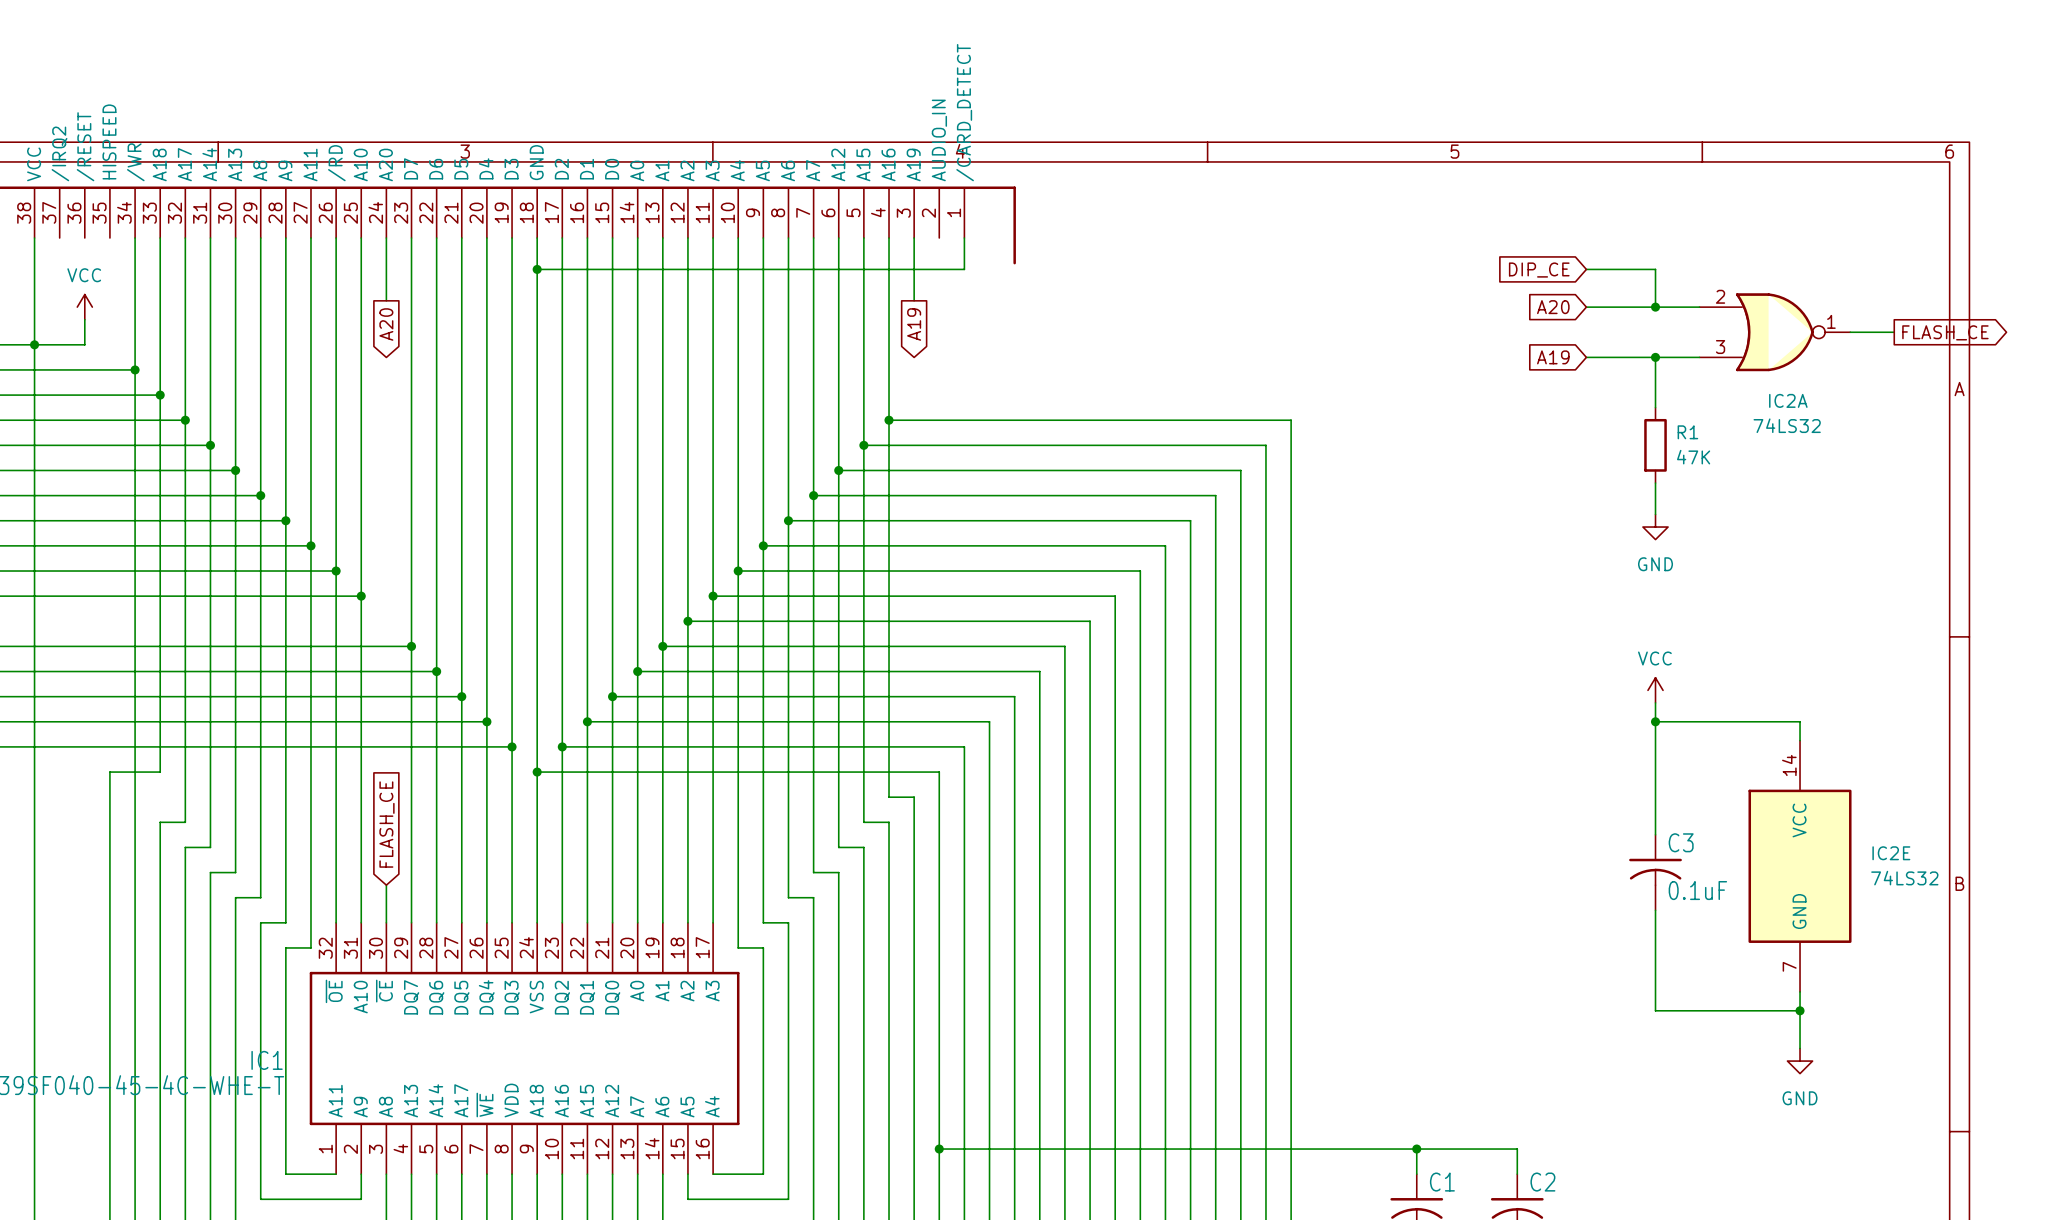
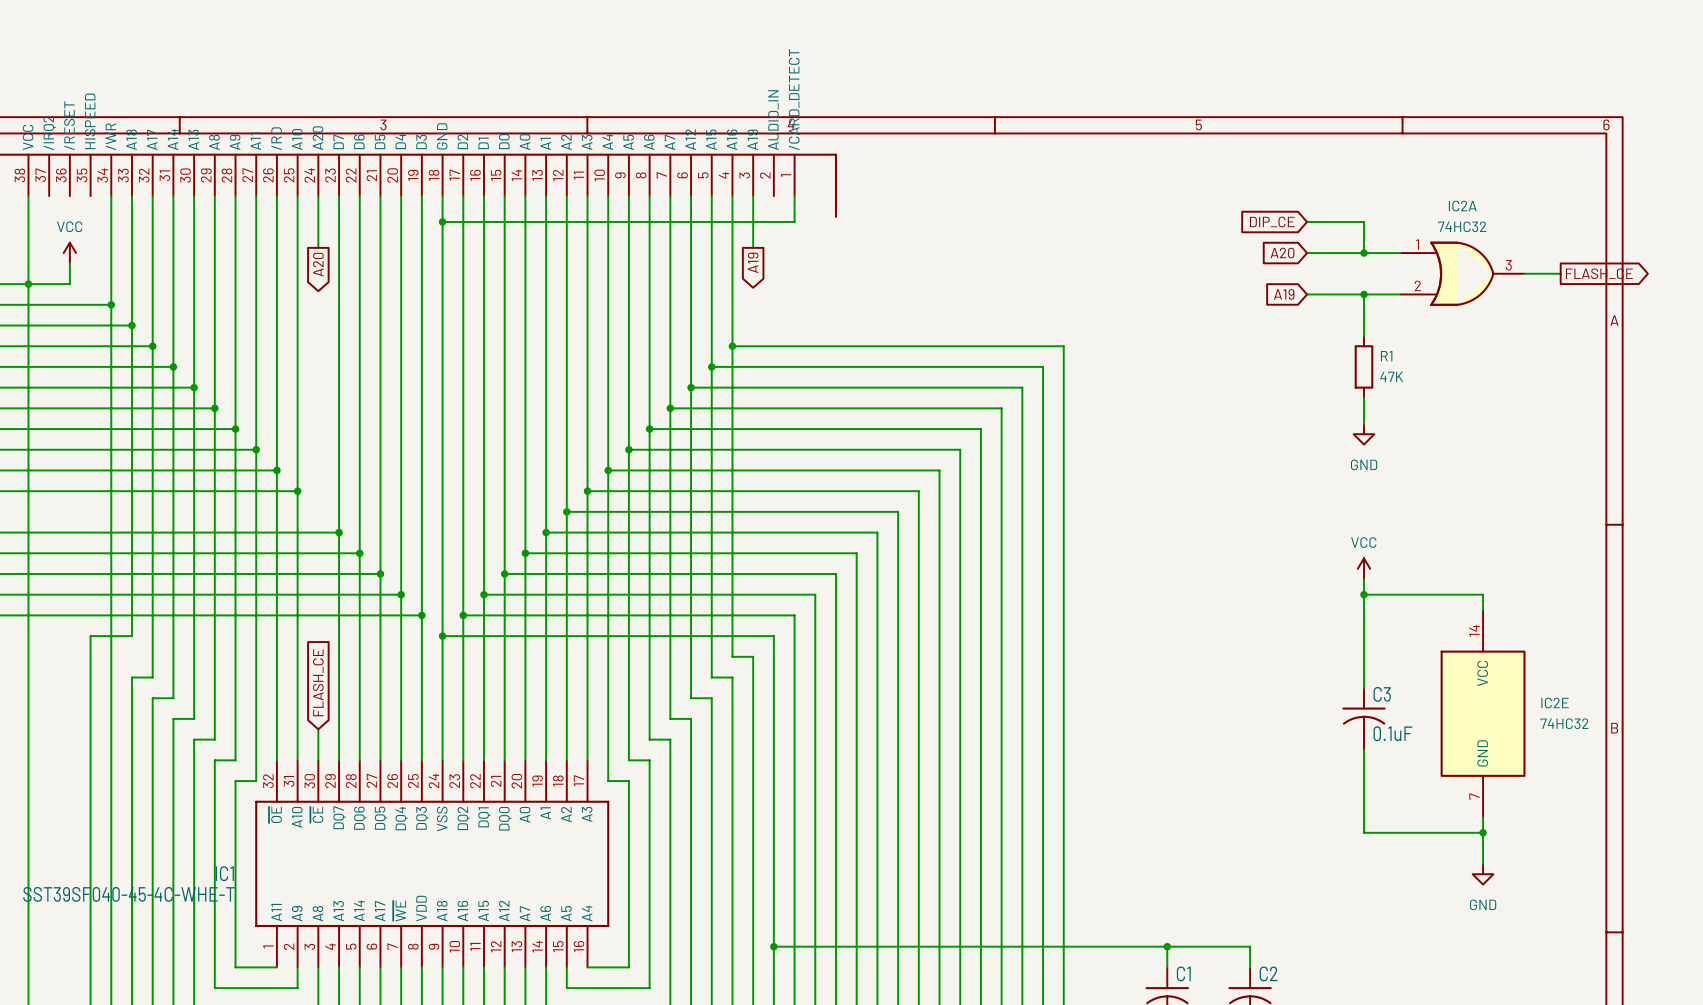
IC2A symbol: [1699, 293, 1851, 372] -> [1400, 241, 1525, 306]
IC2A name position: IC2A (1788, 400) -> IC2A (1462, 206)
IC2A value: 74LS32 (1787, 425) -> 74HC32 (1462, 226)
IC2E value: 74LS32 (1904, 878) -> 74HC32 (1564, 723)

